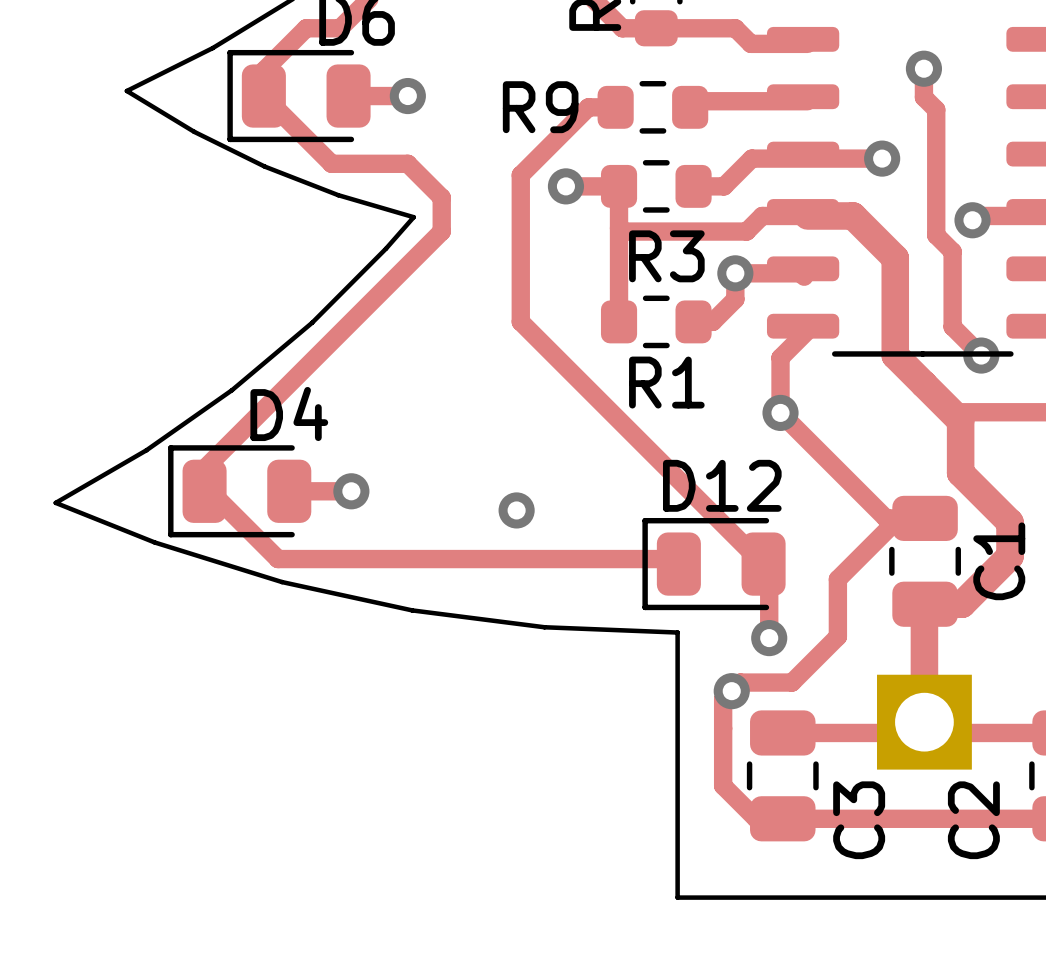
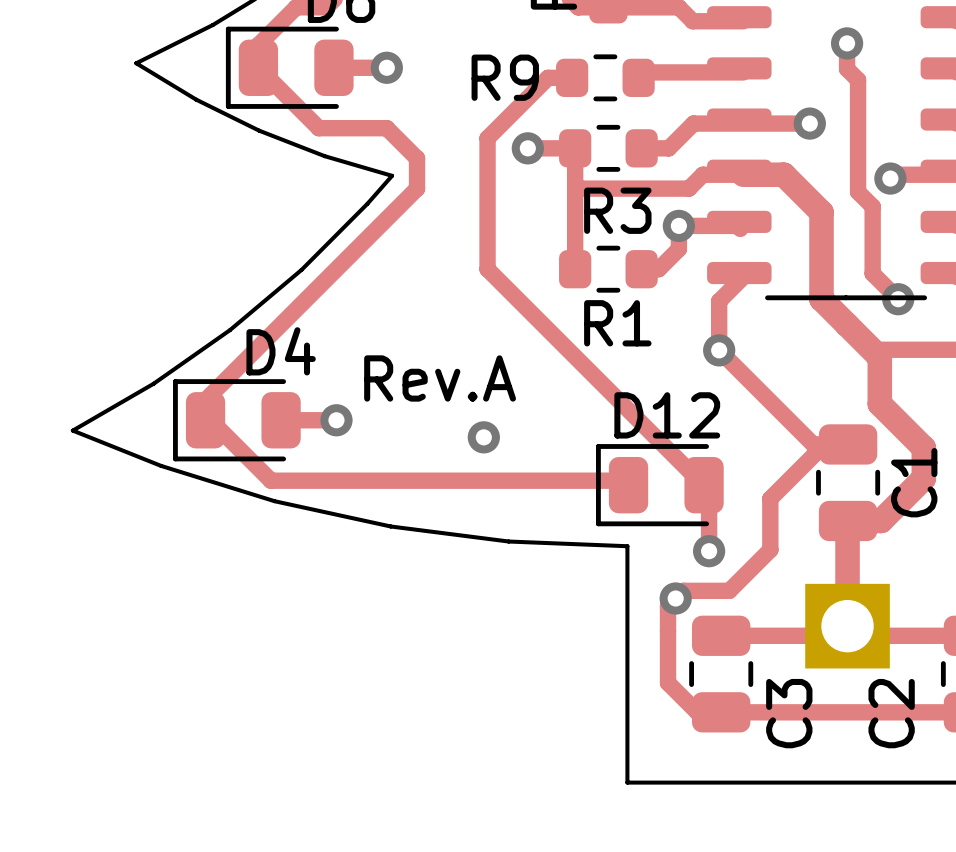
text: none -> Rev.A (440, 378)

